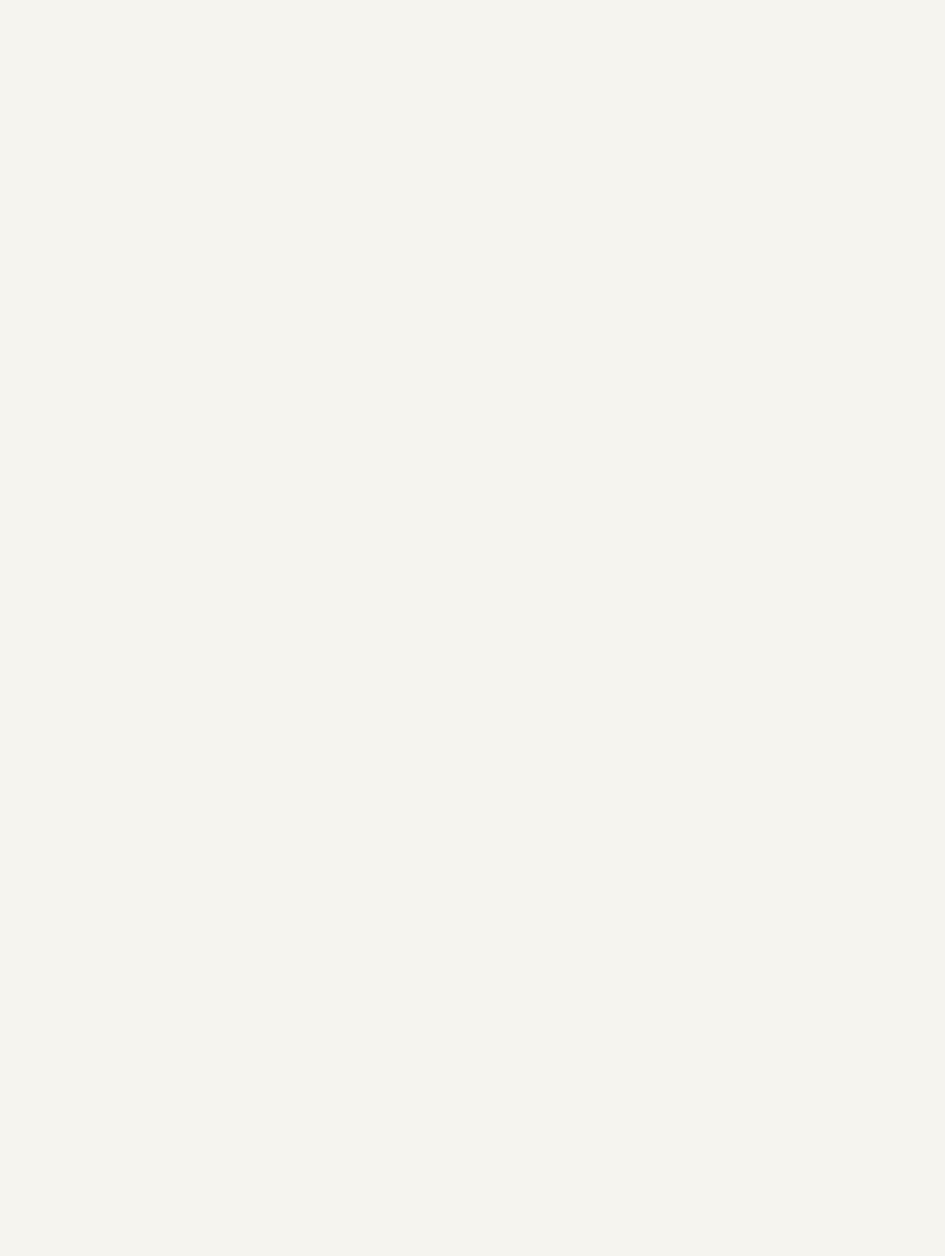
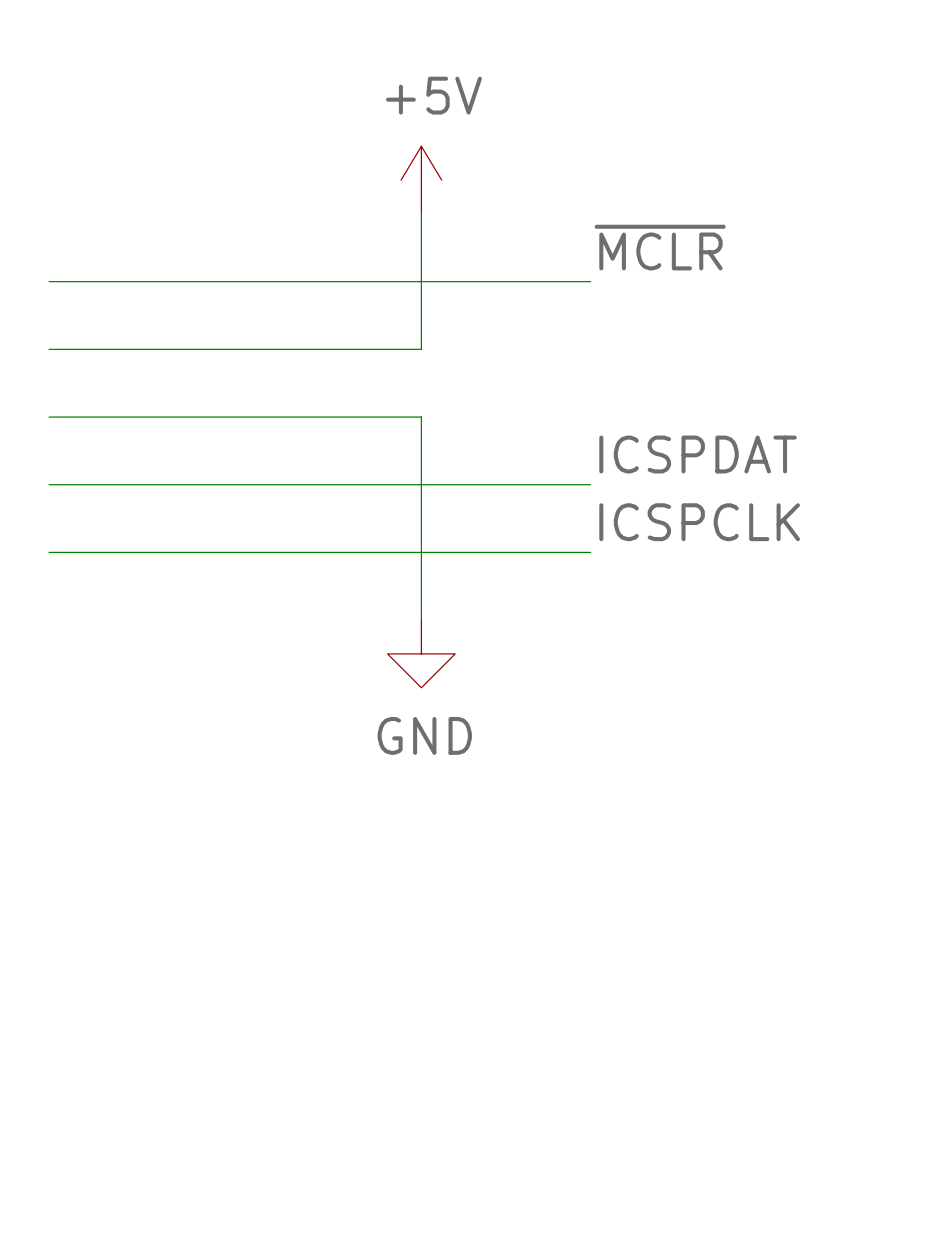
power symbol: none -> +5V (421, 180)
wire: none -> (421, 213) (421, 349) (49, 349)
label: none -> ~{MCLR} (660, 247)
wire: none -> (49, 281) (590, 281)
wire: none -> (49, 417) (421, 417) (421, 620)
label: none -> ICSPDAT (698, 454)
wire: none -> (49, 484) (590, 484)
label: none -> ICSPCLK (699, 522)
wire: none -> (49, 552) (590, 552)
power symbol: none -> GND (421, 653)

